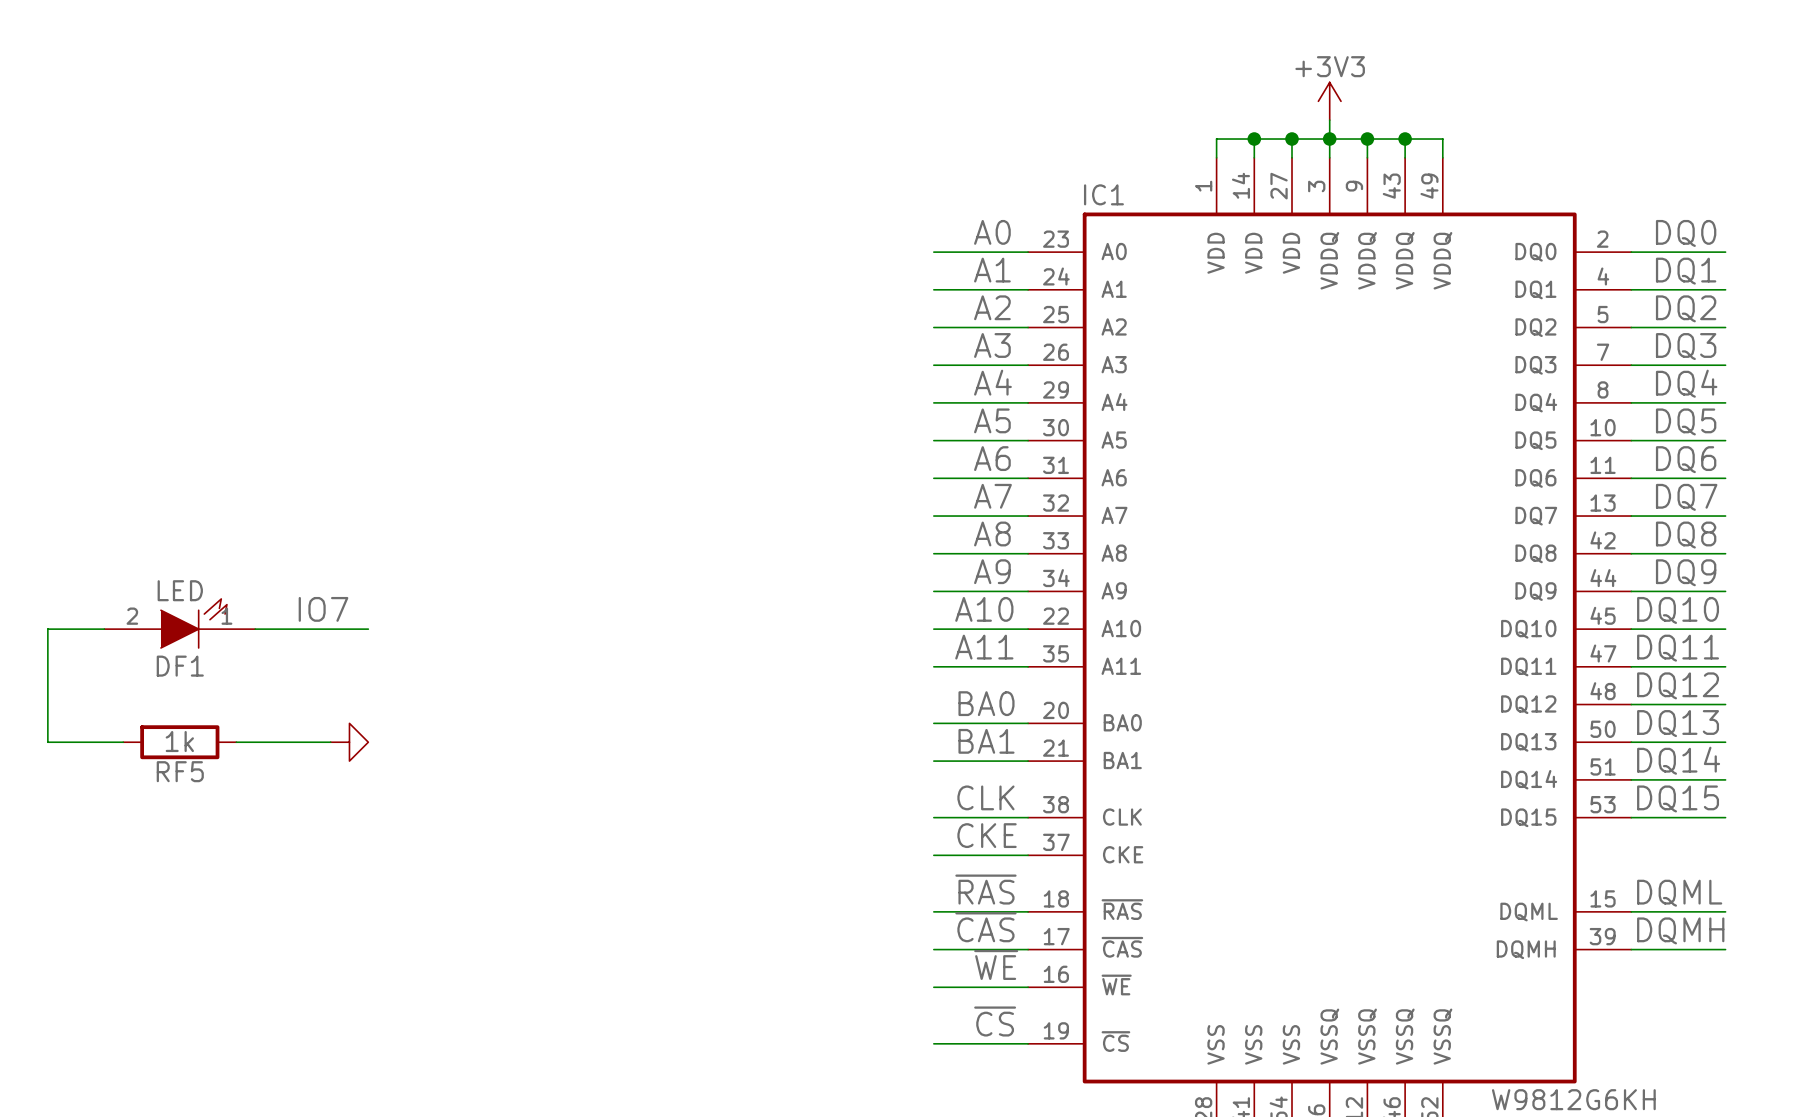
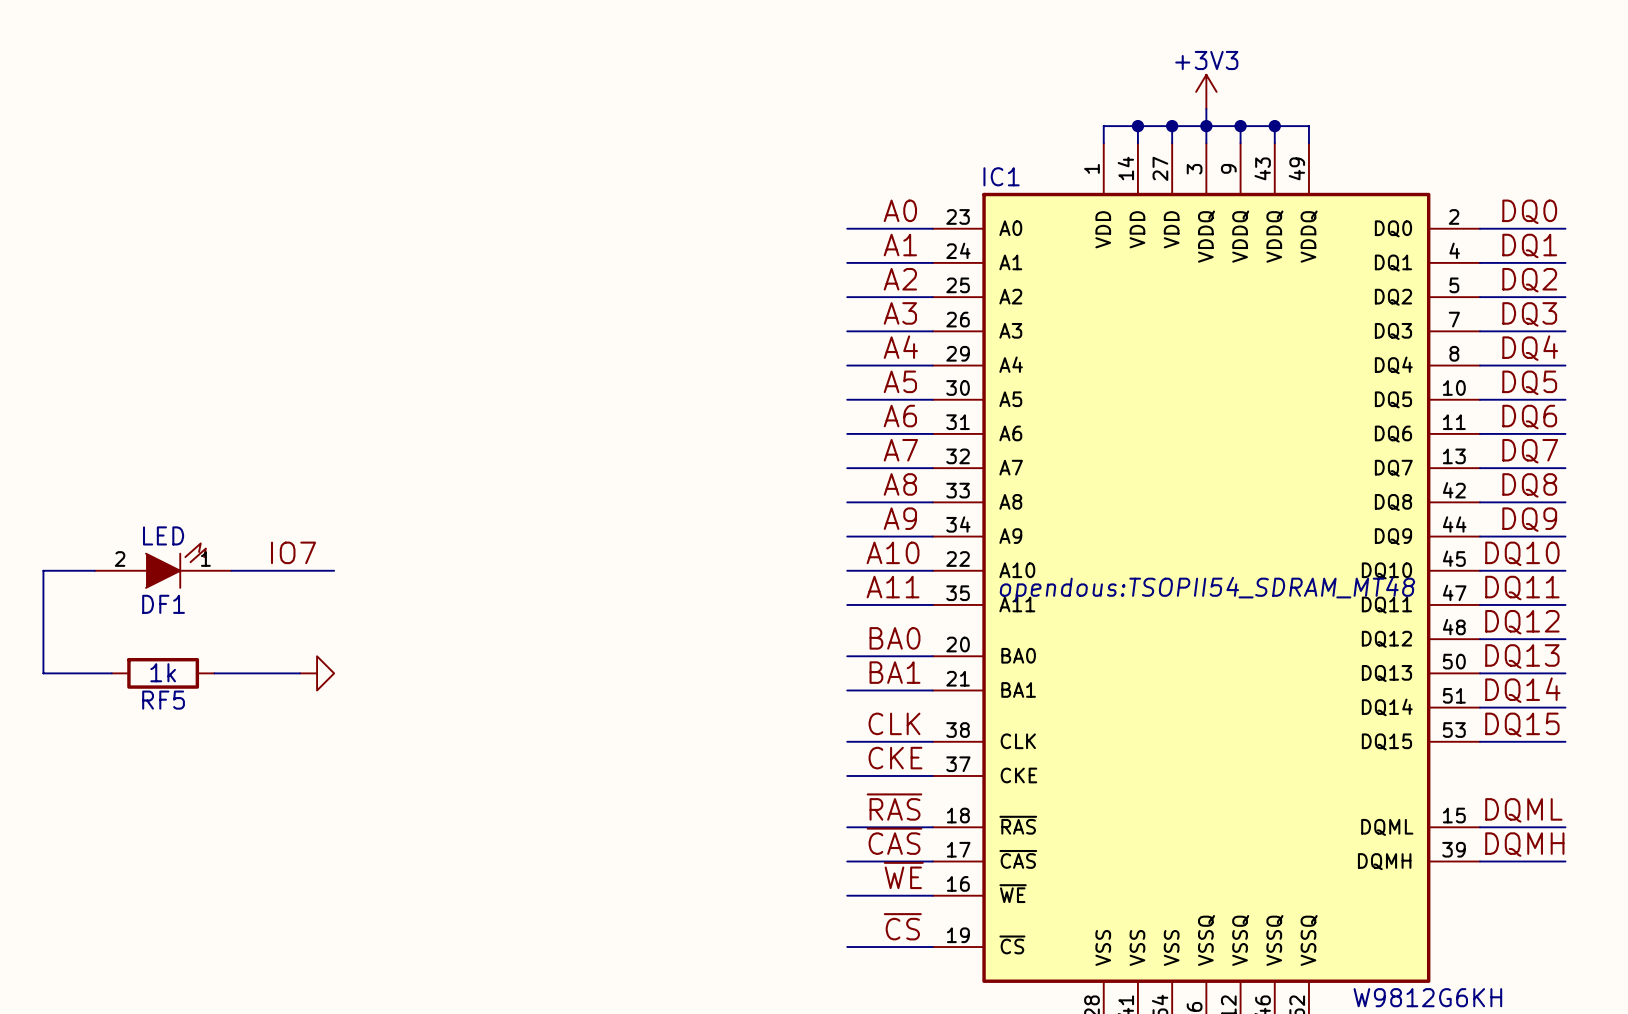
IC1 text: none -> opendous:TSOPII54_SDRAM_MT48 (1207, 589)

